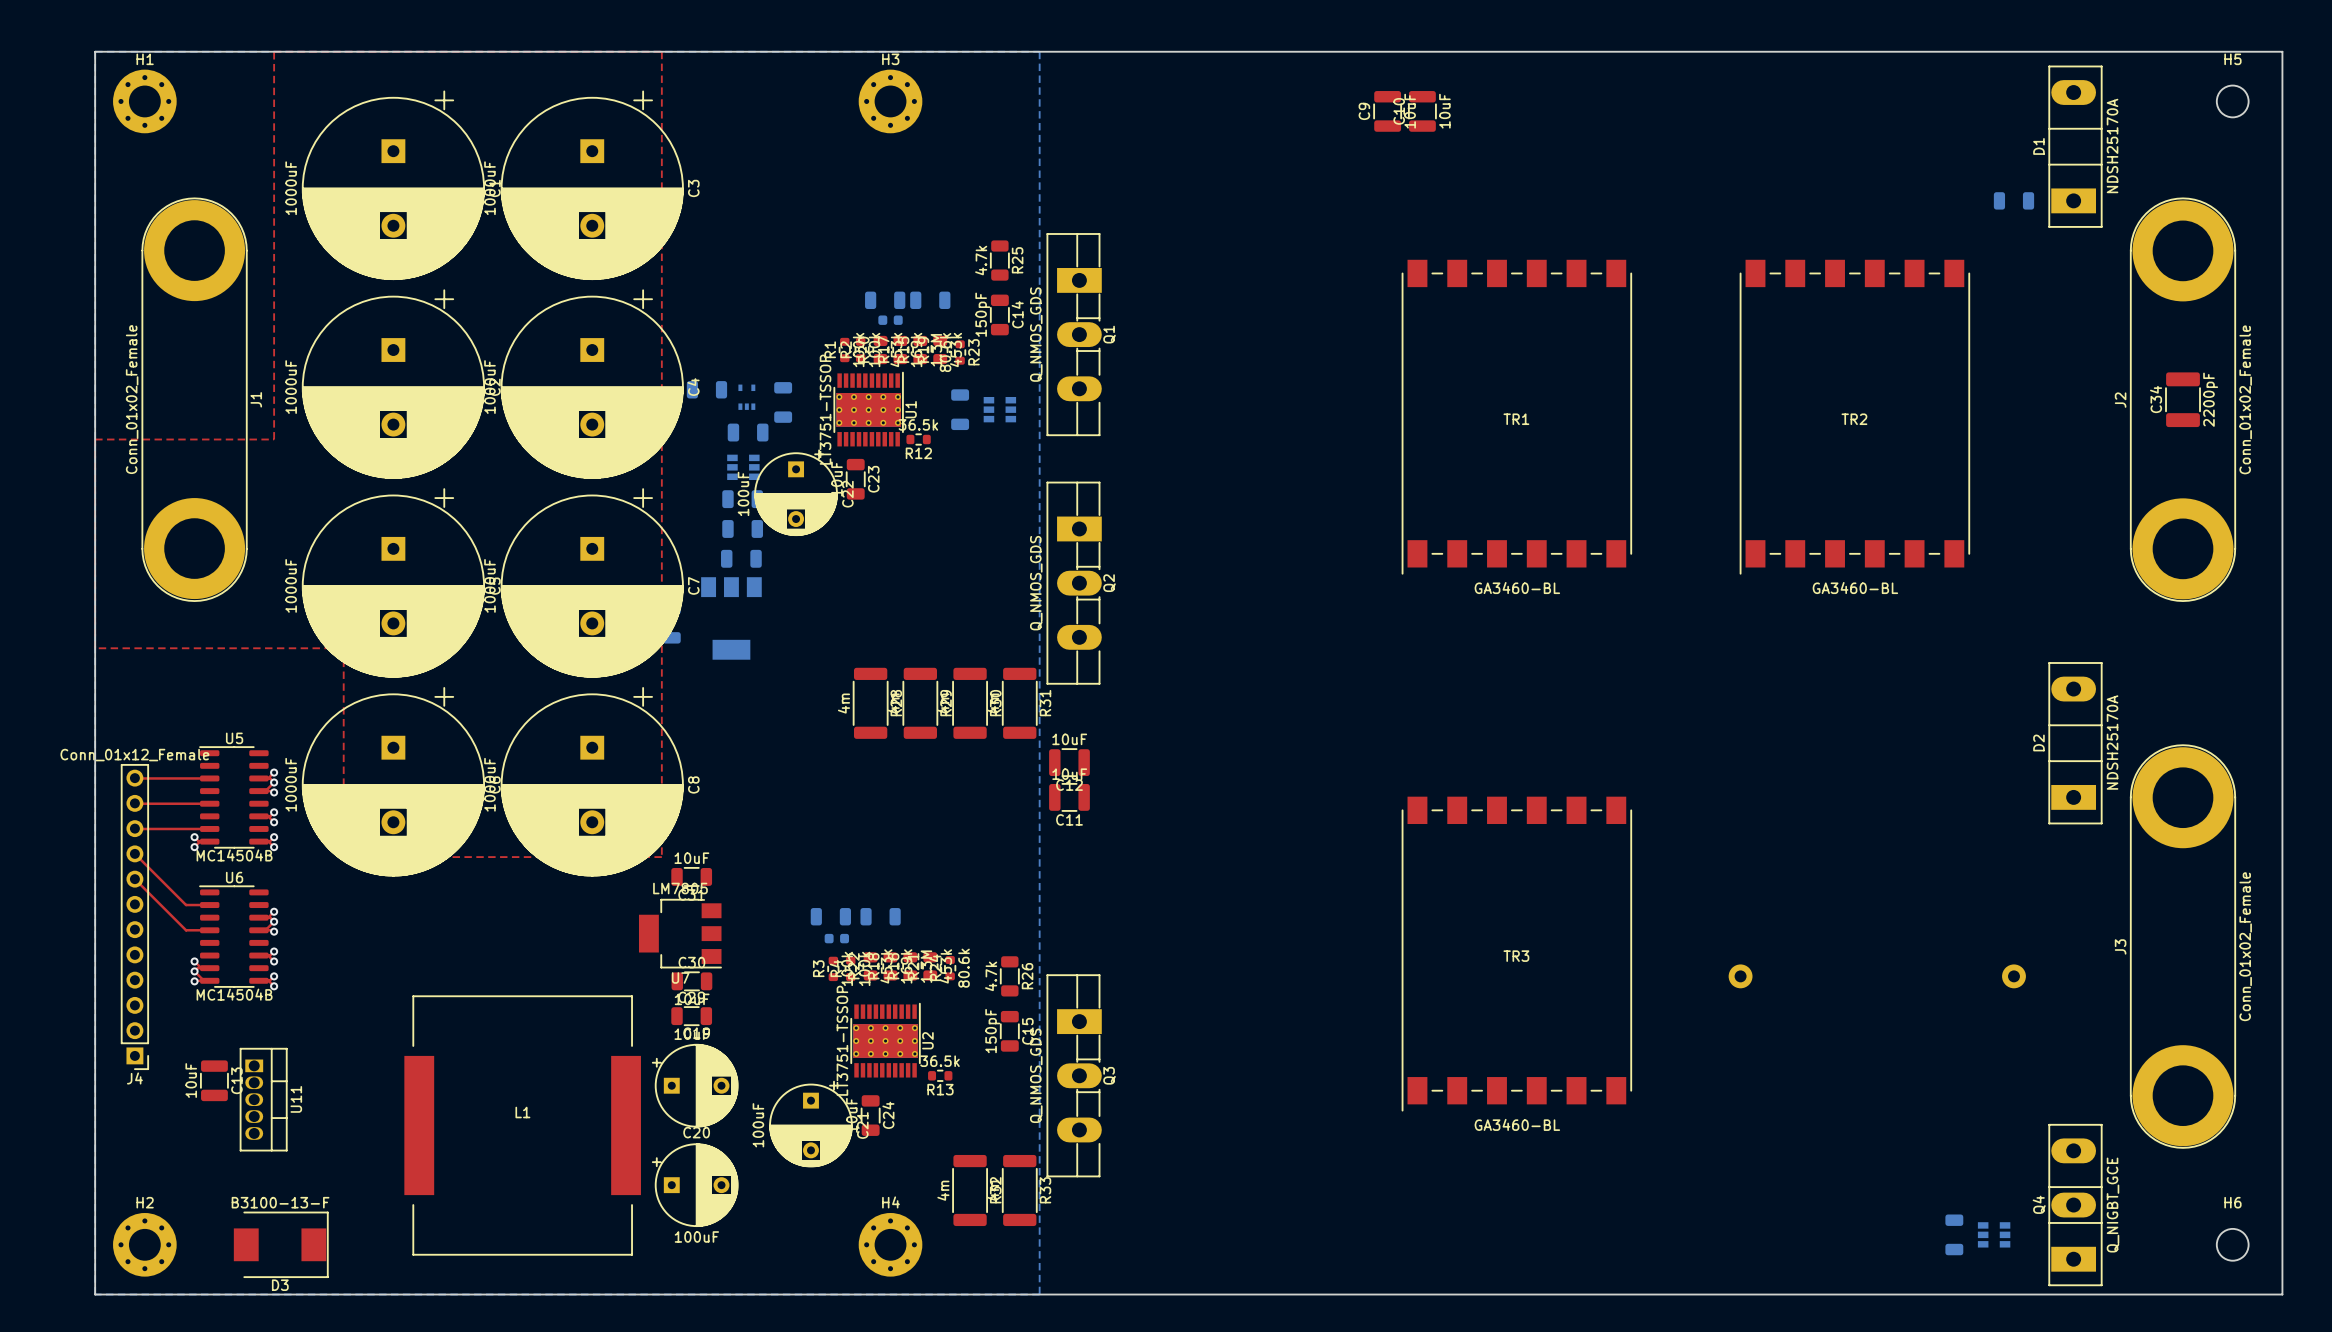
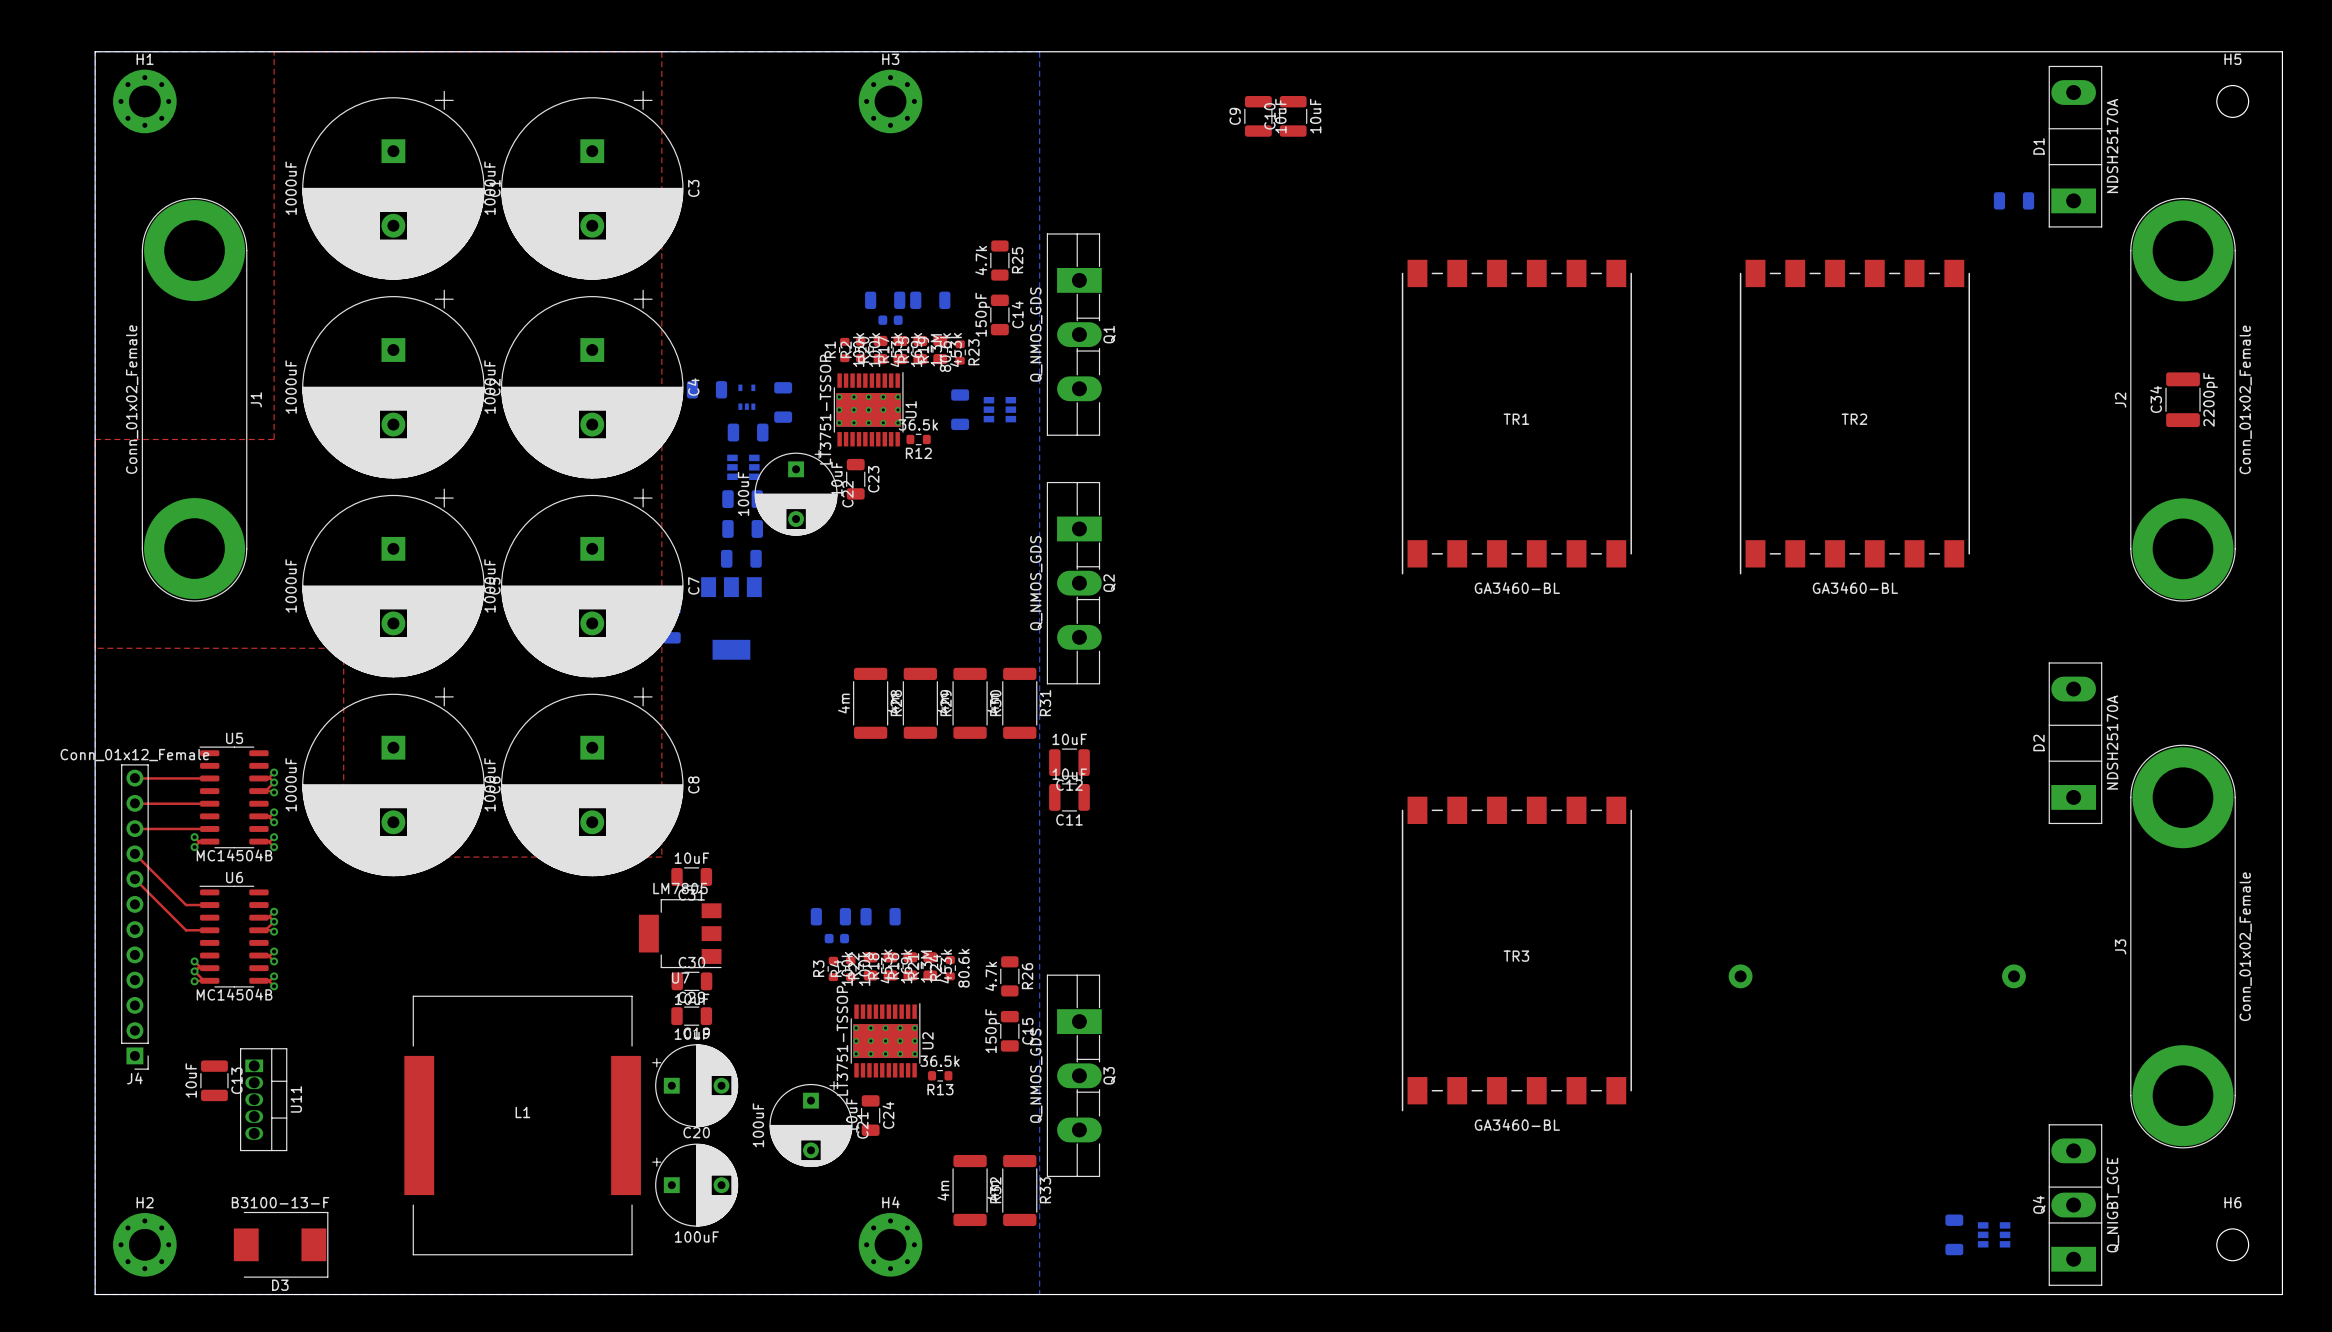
C9 position: (1387, 111) -> (1258, 116)
C10 position: (1422, 111) -> (1293, 116)

